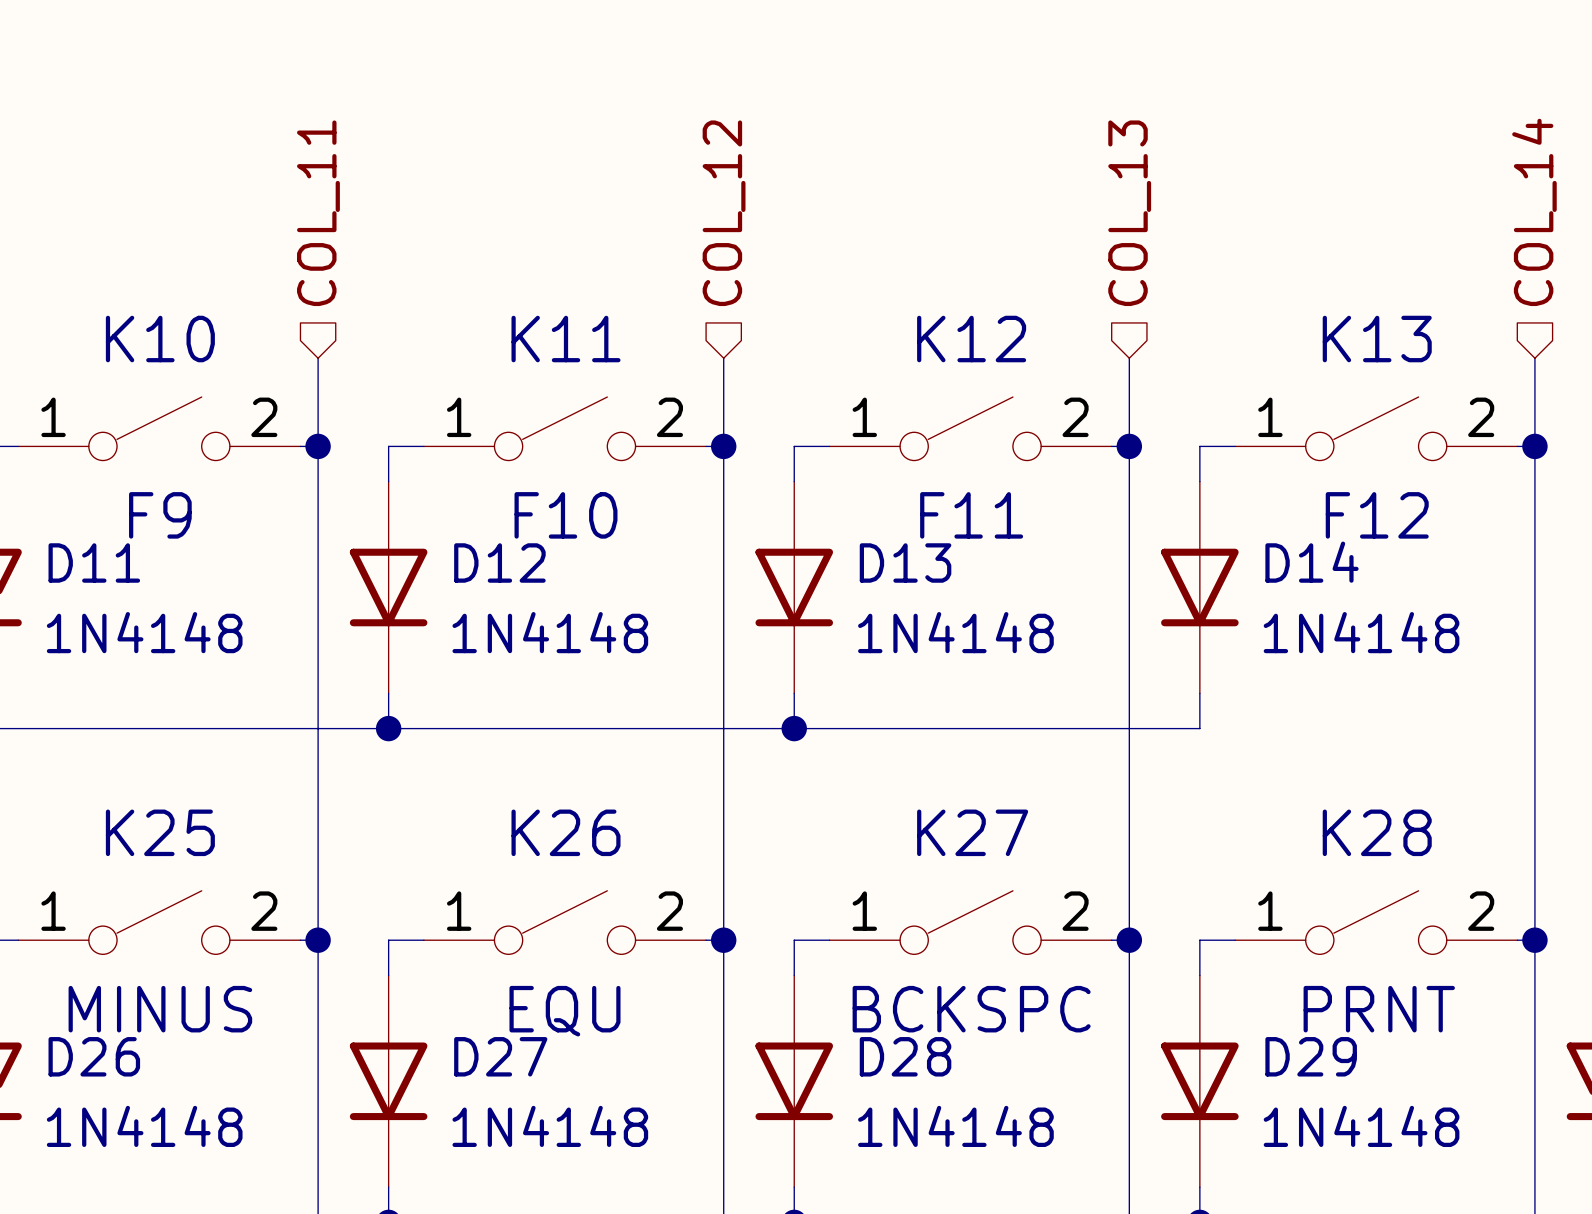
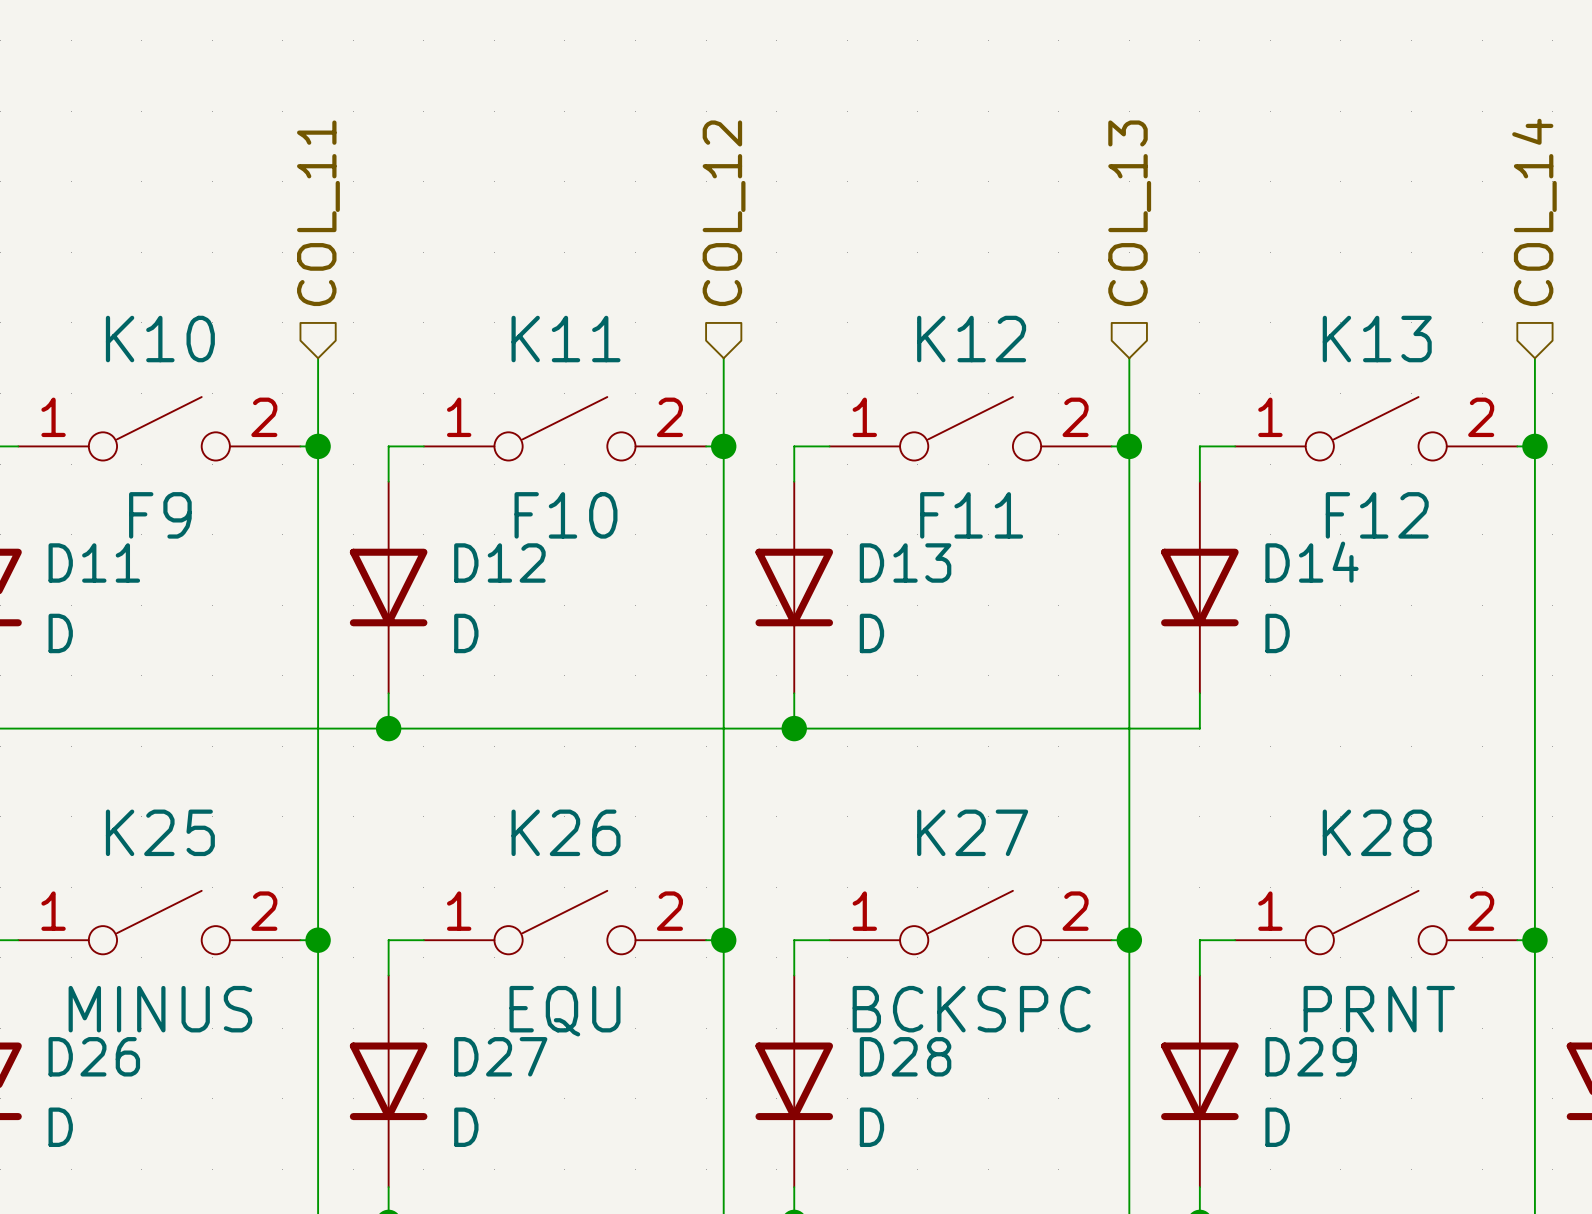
D11 value: 1N4148 (144, 632) -> D (60, 633)
D12 value: 1N4148 (550, 632) -> D (466, 633)
D13 value: 1N4148 (955, 632) -> D (871, 633)
D14 value: 1N4148 (1361, 632) -> D (1277, 633)
D26 value: 1N4148 (144, 1126) -> D (60, 1127)
D27 value: 1N4148 (550, 1126) -> D (466, 1127)
D28 value: 1N4148 (955, 1126) -> D (871, 1127)
D29 value: 1N4148 (1361, 1126) -> D (1277, 1127)

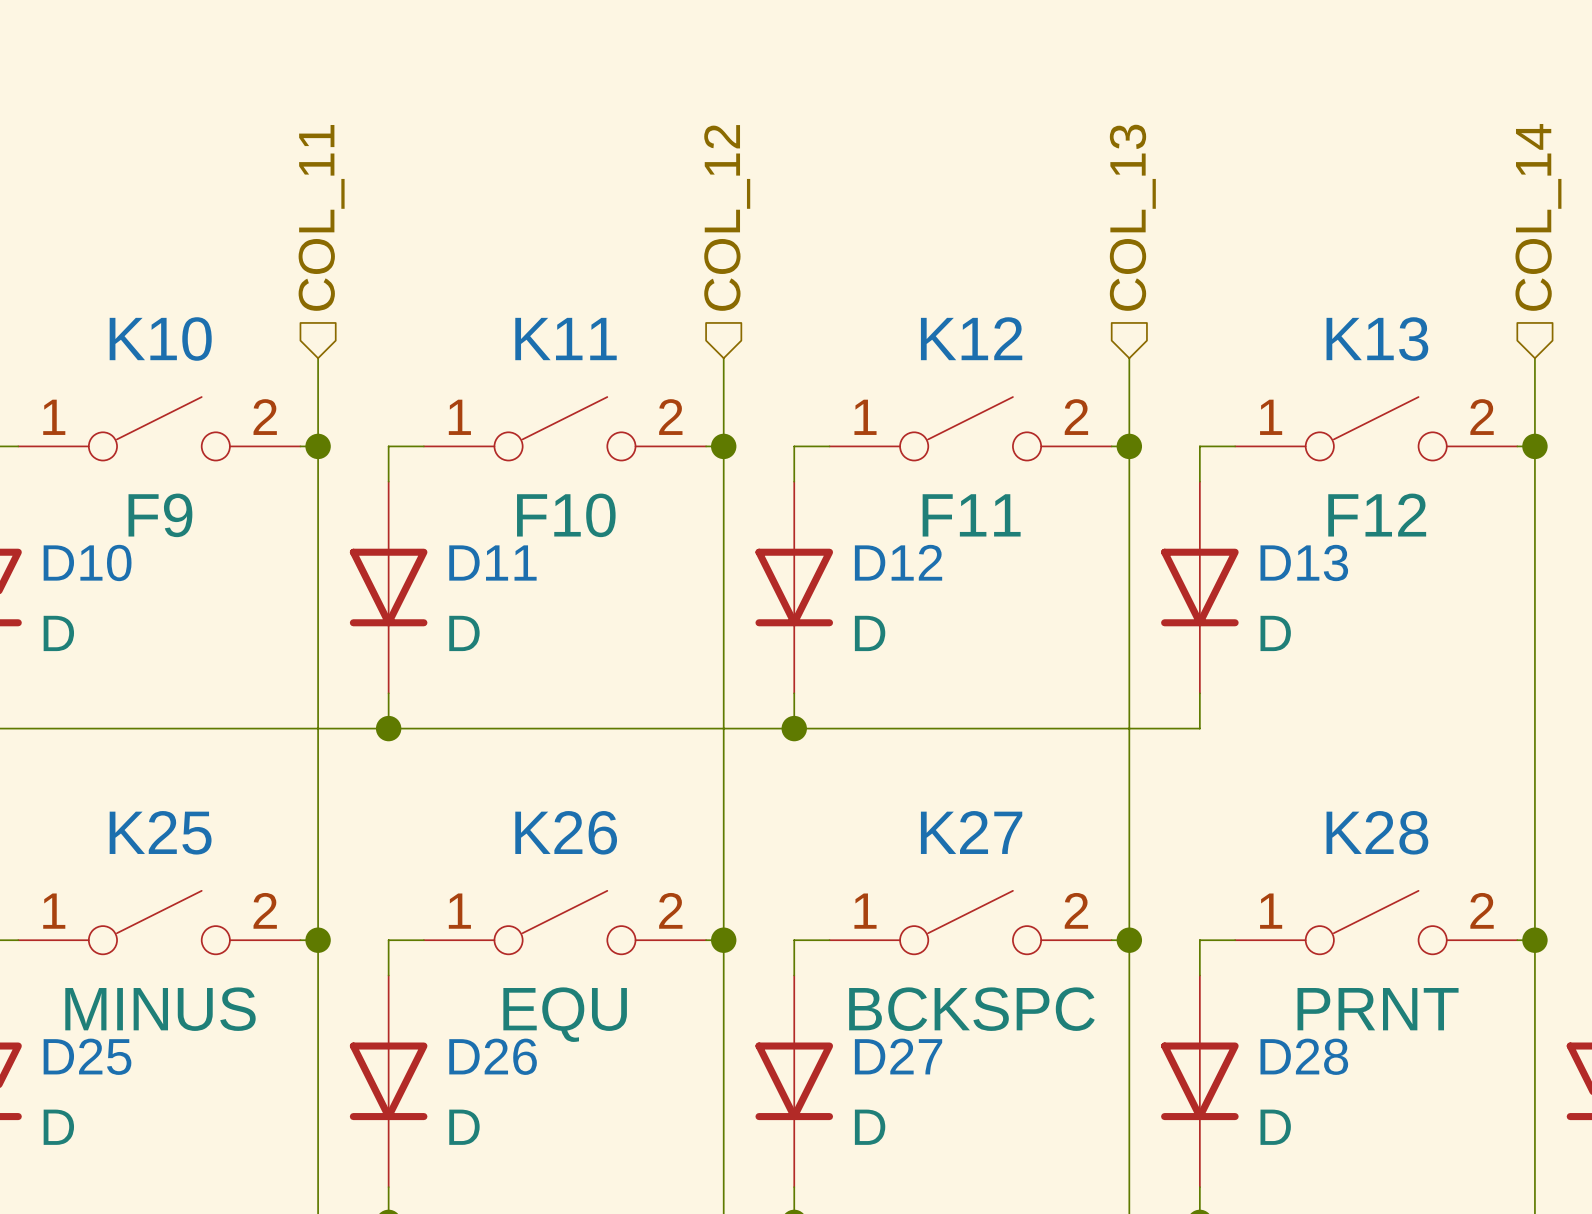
D14 name: D14 (1311, 562) -> D13 (1304, 562)
D11 name: D11 (94, 563) -> D10 (87, 562)
D12 name: D12 (499, 563) -> D11 (492, 563)
D13 name: D13 (905, 563) -> D12 (898, 562)
D26 name: D26 (94, 1056) -> D25 (87, 1056)
D27 name: D27 (500, 1056) -> D26 (493, 1056)
D28 name: D28 (905, 1056) -> D27 (898, 1056)
D29 name: D29 (1311, 1056) -> D28 (1304, 1056)

